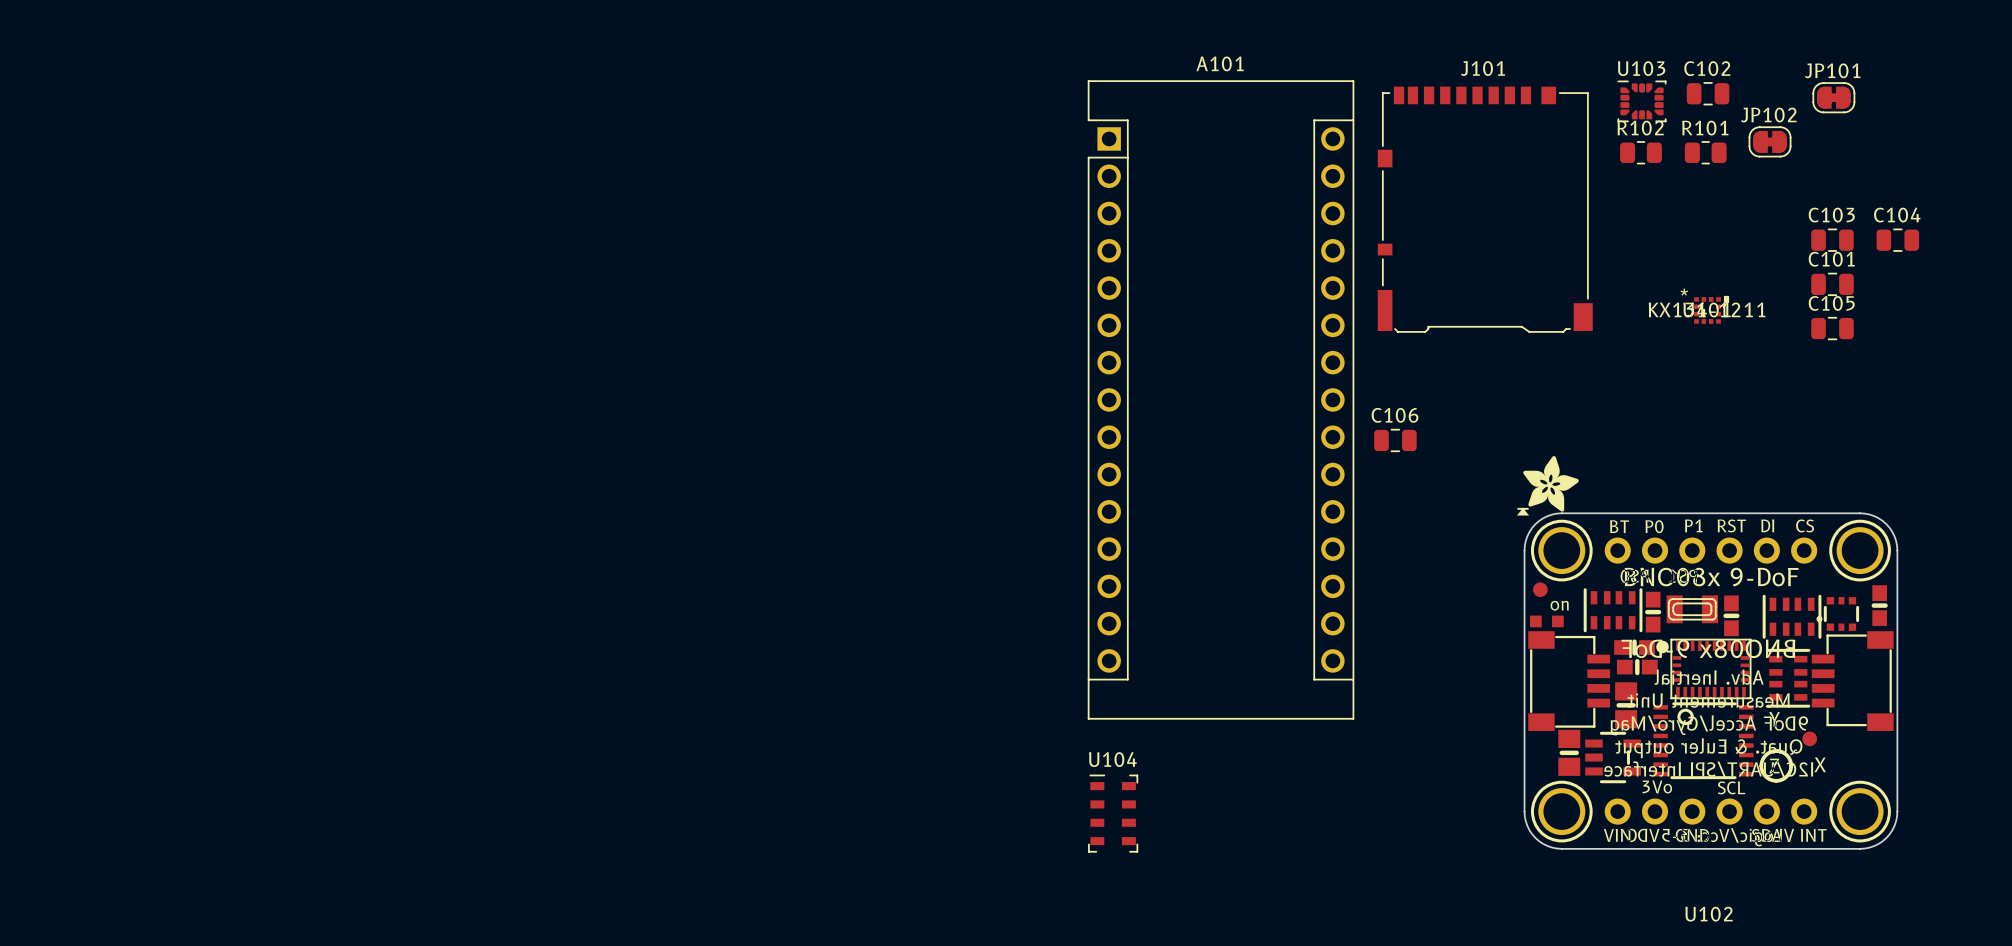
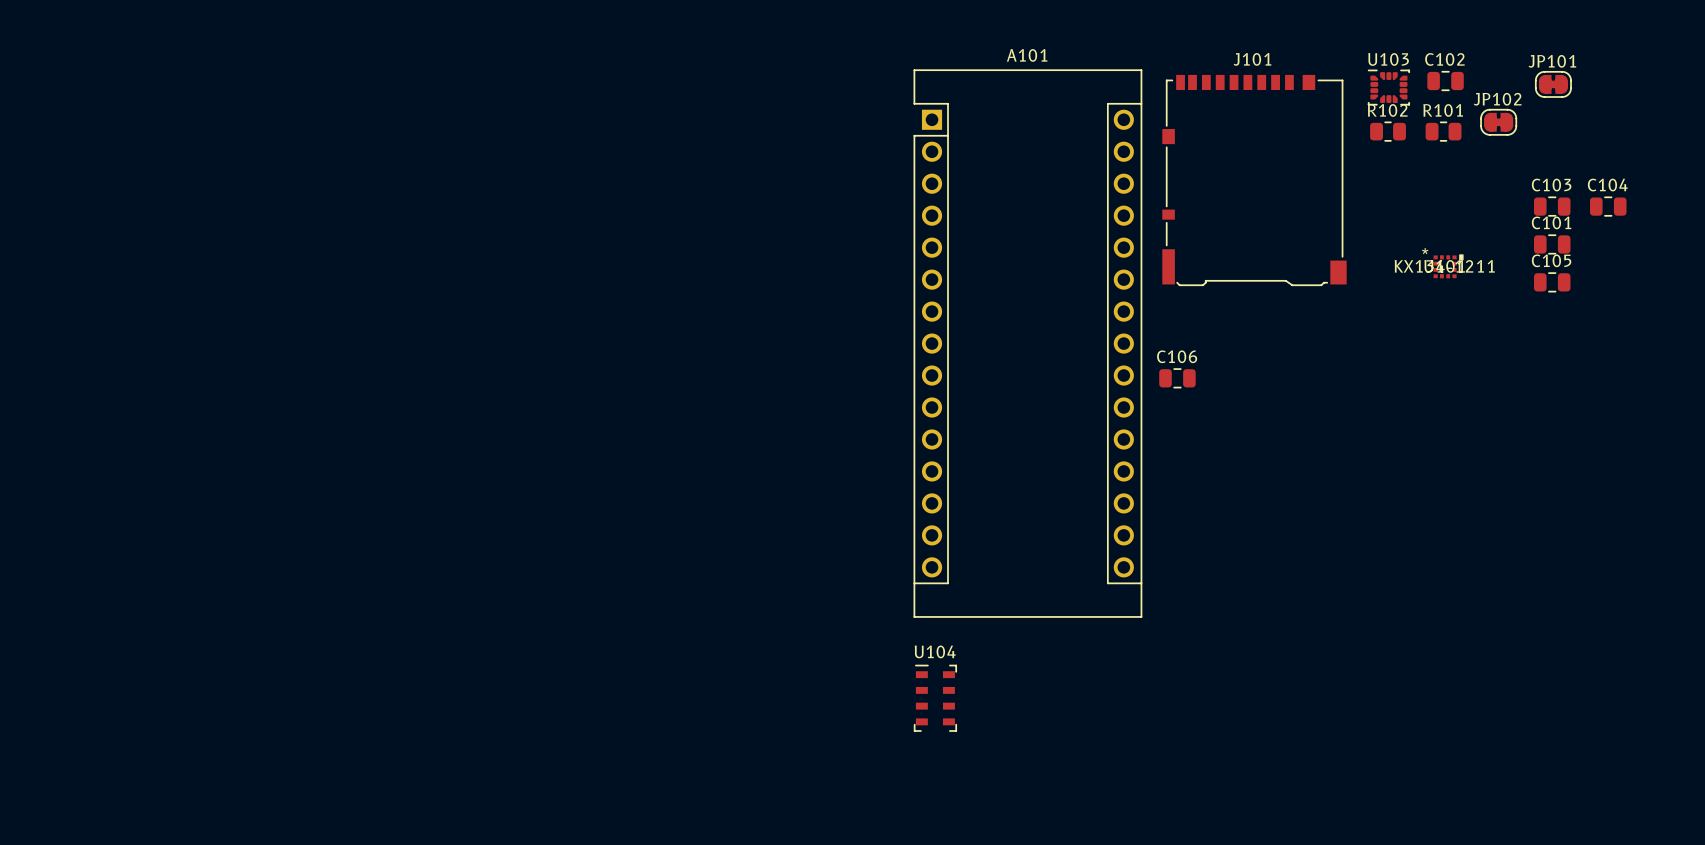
U102: (1707, 652) -> none

